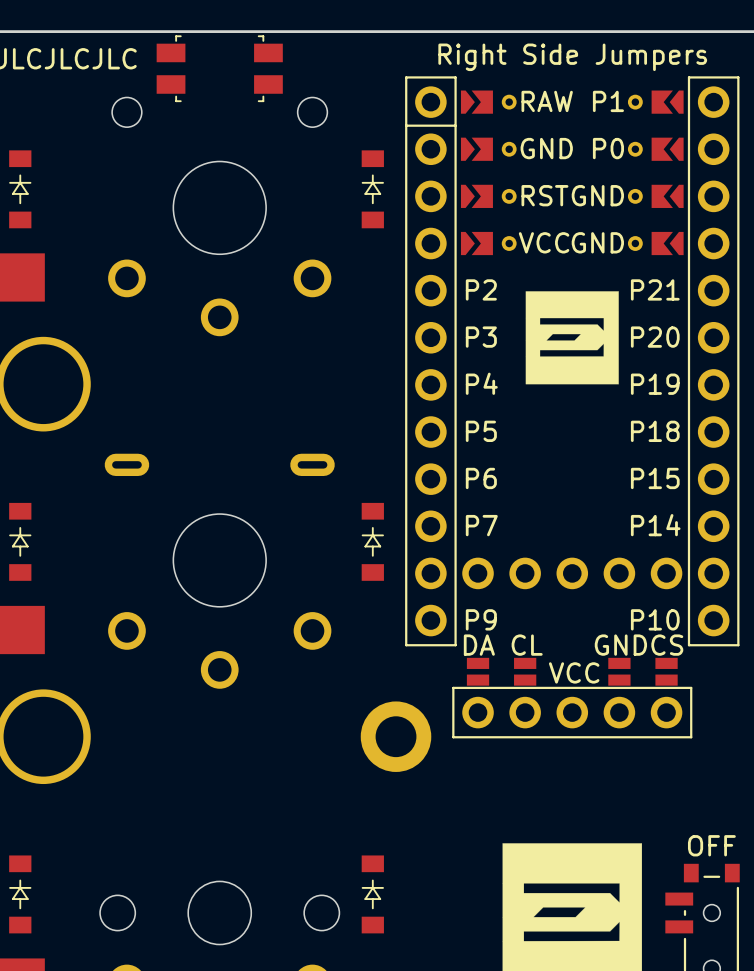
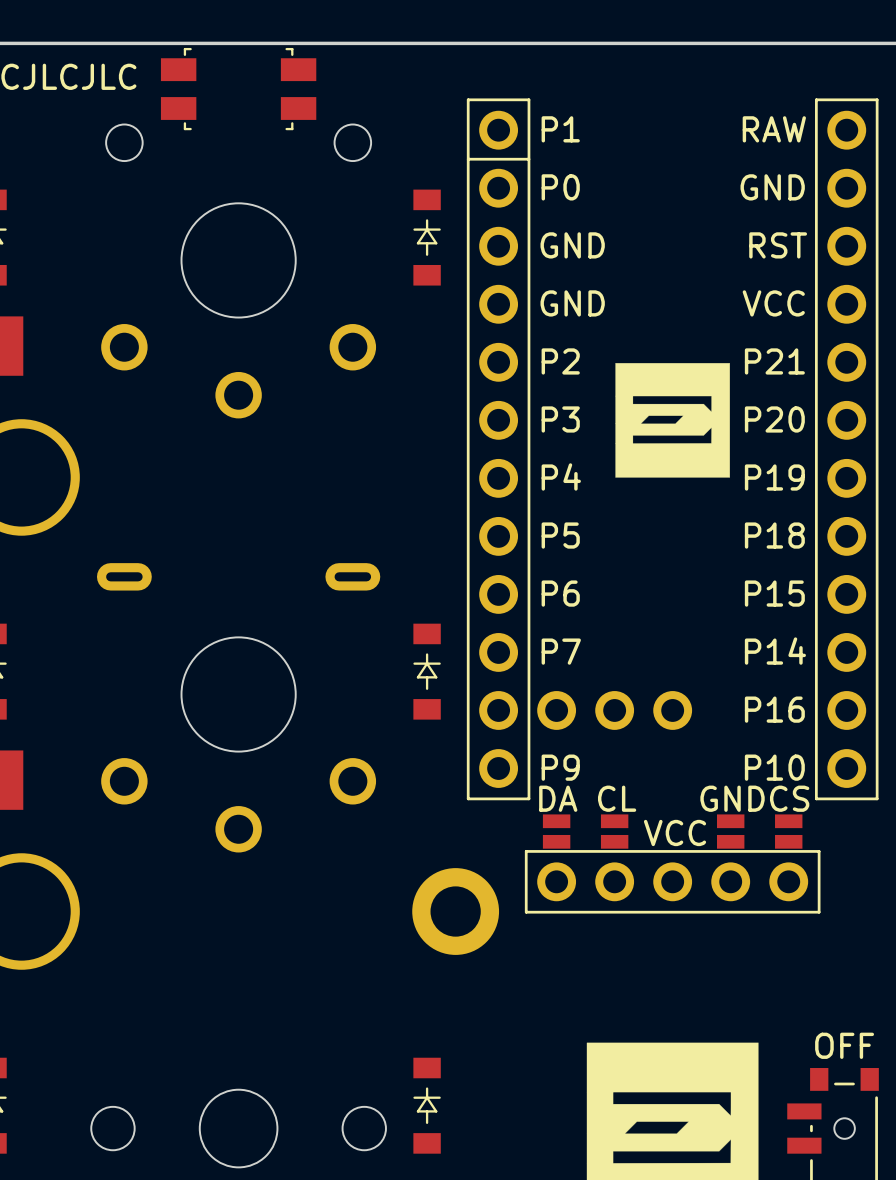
part footprint: [405, 76, 740, 647] -> [466, 98, 879, 801]

